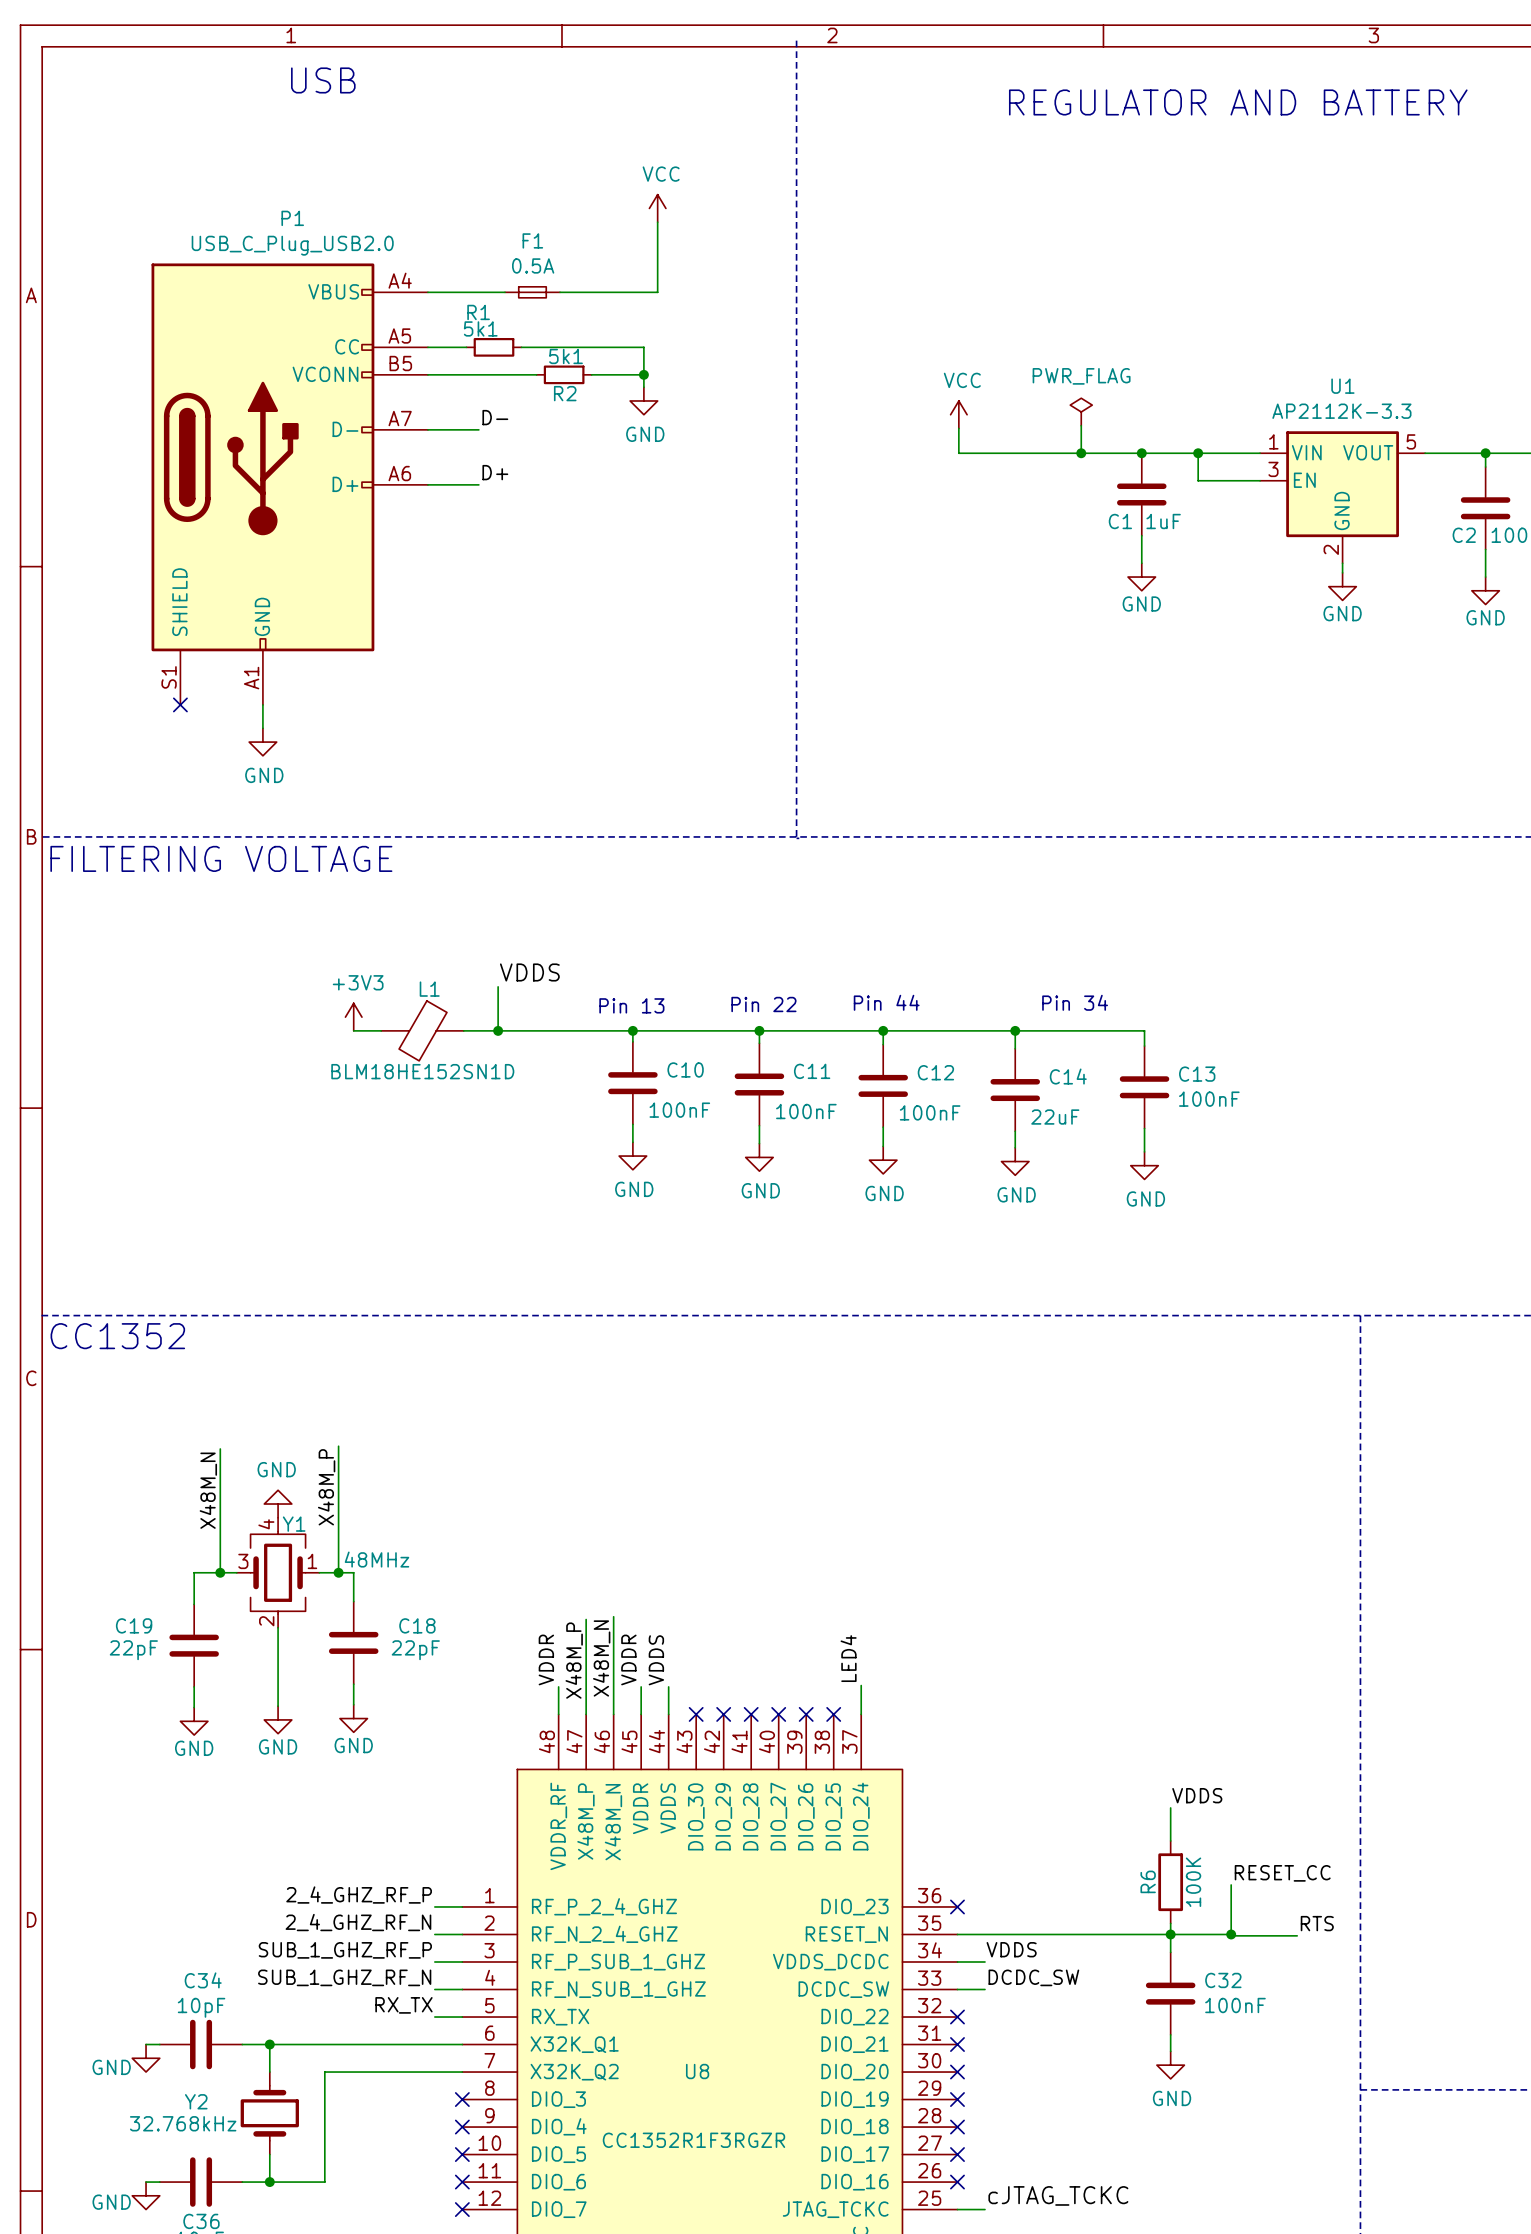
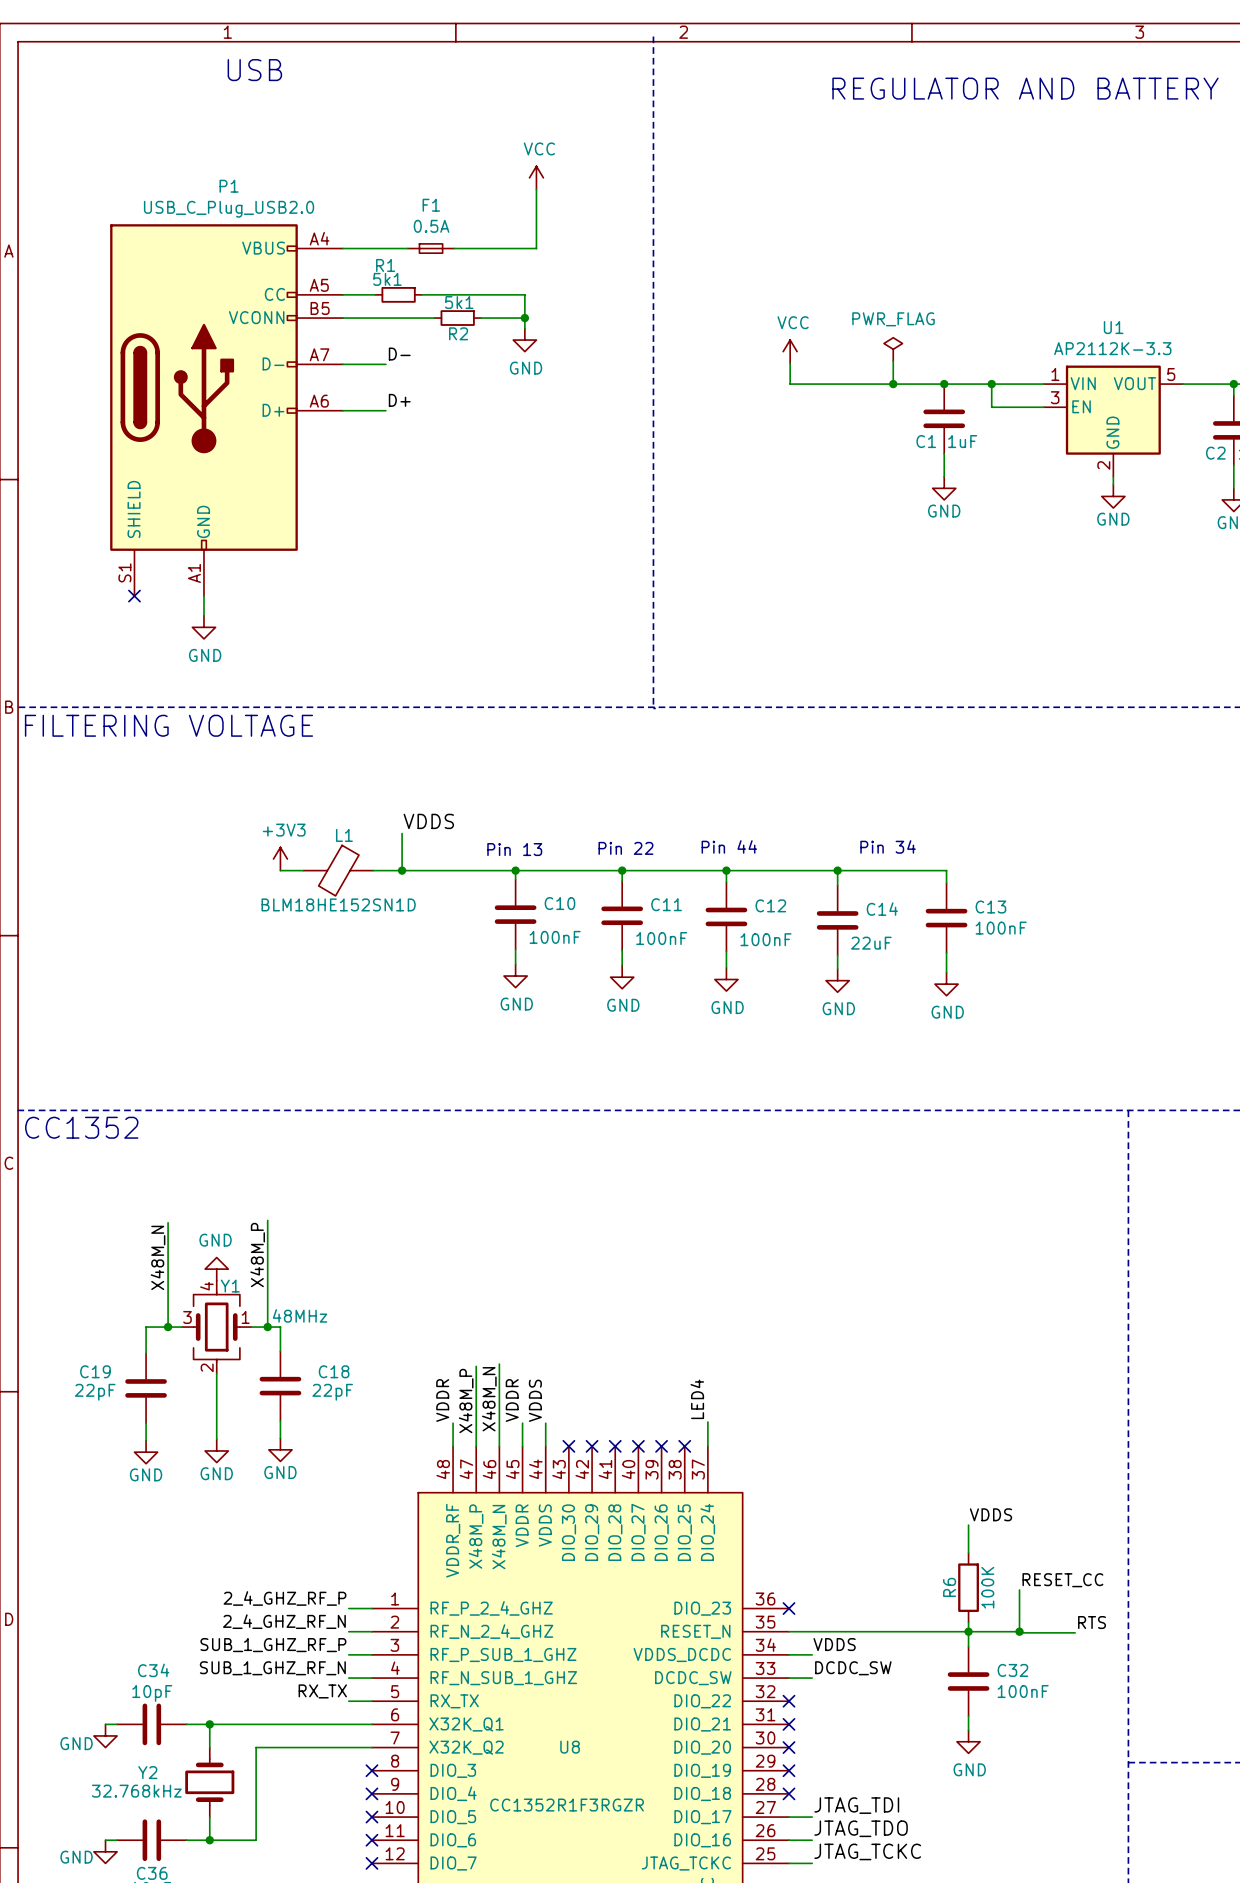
label: none -> JTAG_TDI (856, 1805)
wire: none -> (788, 1817) (812, 1817)
no-connect mark: (957, 2154) -> none
label: none -> JTAG_TDO (861, 1828)
wire: none -> (788, 1840) (812, 1840)
no-connect mark: (957, 2182) -> none
label: cJTAG_TCKC (1058, 2195) -> JTAG_TCKC (867, 1851)

